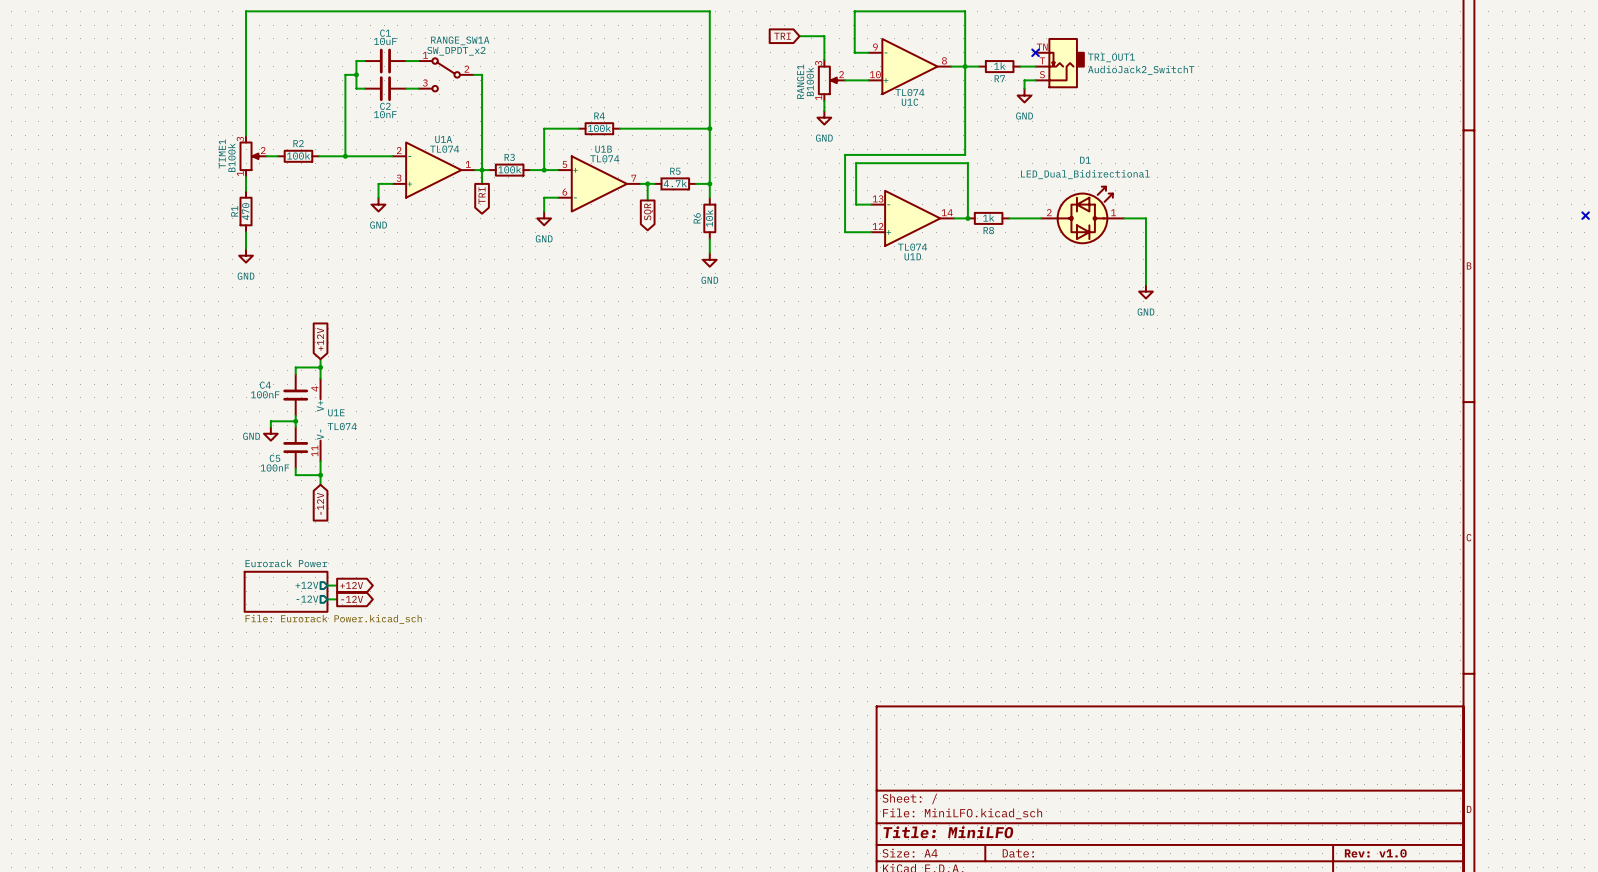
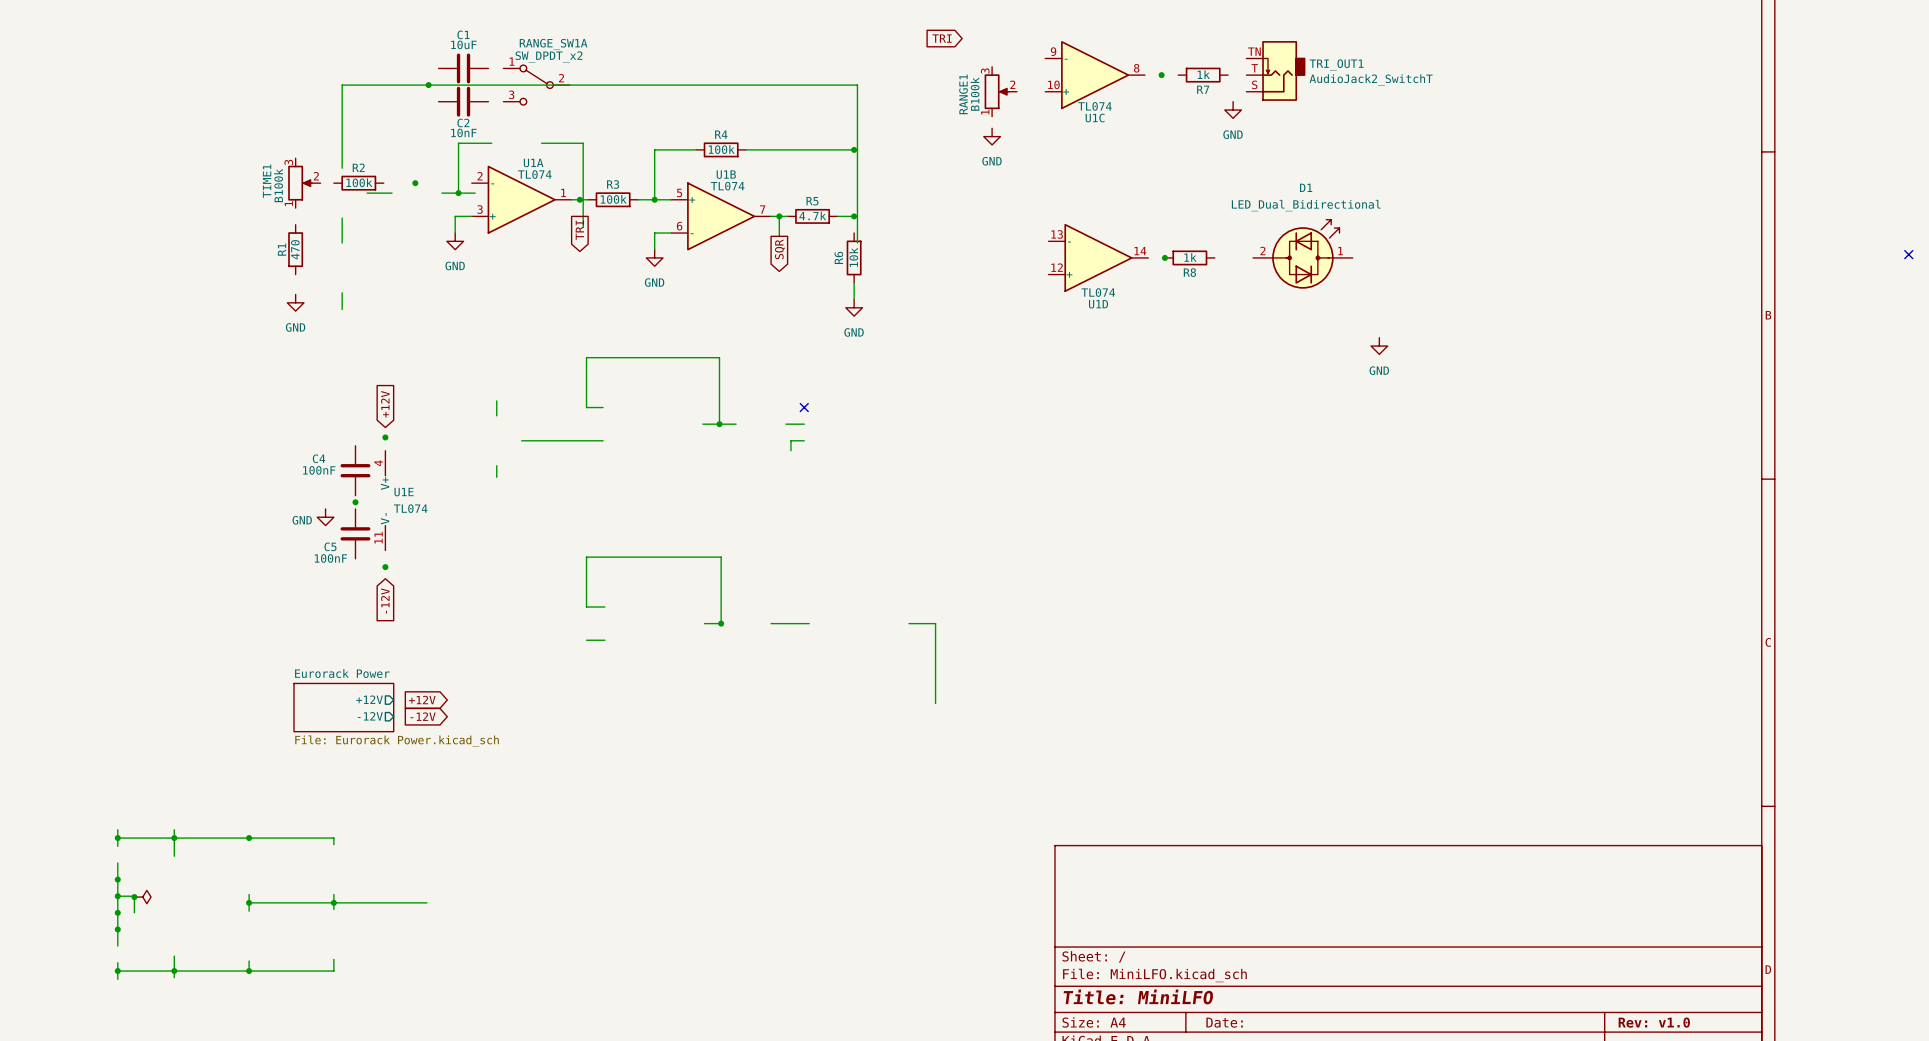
wire: (799, 36) (824, 36) (824, 59) -> none
wire: (868, 52) (854, 52) (854, 11) (965, 11) (965, 154) (845, 154) (845, 232) (871, 232) -> none
no-connect mark: (1035, 52) -> none
wire: (364, 61) (356, 61) (356, 88) (364, 88) -> none
wire: (406, 61) (418, 61) -> none
wire: (951, 66) (978, 66) -> none
wire: (1020, 66) (1035, 66) -> none
wire: (345, 74) (345, 156) -> (415, 85) (342, 85) (342, 168)
wire: none -> (428, 85) (569, 85)
wire: (482, 74) (482, 183) -> (579, 85) (857, 85) (857, 242)
wire: (845, 80) (868, 80) -> none
wire: (1035, 80) (1024, 80) (1024, 88) -> none
wire: (406, 88) (418, 88) -> none
wire: (824, 101) (824, 110) -> none
wire: none -> (491, 143) (458, 143) (458, 193)
wire: none -> (541, 143) (583, 143) (583, 226)
wire: (246, 135) (246, 11) (709, 11) (709, 197) -> none
wire: (266, 156) (277, 156) -> none
wire: (319, 156) (392, 156) -> none
wire: none -> (367, 193) (392, 193)
wire: none -> (441, 193) (475, 193)
junction: none -> (458, 193)
wire: (246, 177) (246, 190) -> (342, 292) (342, 309)
wire: none -> (342, 218) (342, 242)
wire: (871, 204) (856, 204) (856, 163) (967, 163) (967, 218) (954, 218) -> none
wire: (1009, 218) (1041, 218) -> none
wire: (1123, 218) (1145, 218) (1145, 284) -> none
wire: (246, 232) (246, 248) -> none
wire: none -> (496, 400) (496, 415)
wire: none -> (603, 407) (586, 407) (586, 357) (719, 357) (719, 424)
no-connect mark: none -> (804, 407)
wire: none -> (702, 424) (736, 424)
junction: none -> (719, 424)
wire: none -> (785, 424) (804, 424)
wire: (320, 359) (320, 378) -> none
wire: (320, 367) (295, 367) (295, 374) -> none
wire: none -> (521, 440) (603, 440)
wire: none -> (804, 440) (790, 440) (790, 450)
wire: none -> (496, 465) (496, 477)
wire: (295, 415) (295, 426) -> none
wire: (295, 421) (270, 421) (270, 426) -> none
wire: (320, 461) (320, 484) -> none
wire: (295, 468) (295, 475) (320, 475) -> none
wire: none -> (604, 607) (586, 607) (586, 557) (721, 557) (721, 623) (704, 623)
junction: none -> (721, 623)
wire: none -> (771, 623) (809, 623)
wire: none -> (908, 623) (935, 623) (935, 703)
wire: none -> (586, 640) (604, 640)
wire: (327, 585) (337, 585) -> none
wire: (327, 599) (337, 599) -> none
wire: none -> (117, 829) (117, 846)
wire: none -> (174, 829) (174, 856)
wire: none -> (117, 838) (333, 838) (333, 844)
junction: none -> (117, 838)
junction: none -> (174, 838)
junction: none -> (249, 838)
wire: none -> (117, 862) (117, 946)
junction: none -> (117, 879)
wire: none -> (249, 894) (249, 911)
wire: none -> (333, 894) (333, 909)
wire: none -> (117, 896) (134, 896) (134, 912)
junction: none -> (117, 896)
junction: none -> (134, 897)
power symbol: none -> (142, 897)
wire: none -> (249, 902) (426, 902)
junction: none -> (249, 902)
junction: none -> (333, 902)
junction: none -> (117, 912)
junction: none -> (117, 929)
wire: none -> (174, 956) (174, 977)
wire: none -> (333, 959) (333, 971) (117, 971)
wire: none -> (249, 961) (249, 971)
wire: none -> (117, 962) (117, 979)
junction: none -> (117, 971)
junction: none -> (174, 971)
junction: none -> (249, 971)

